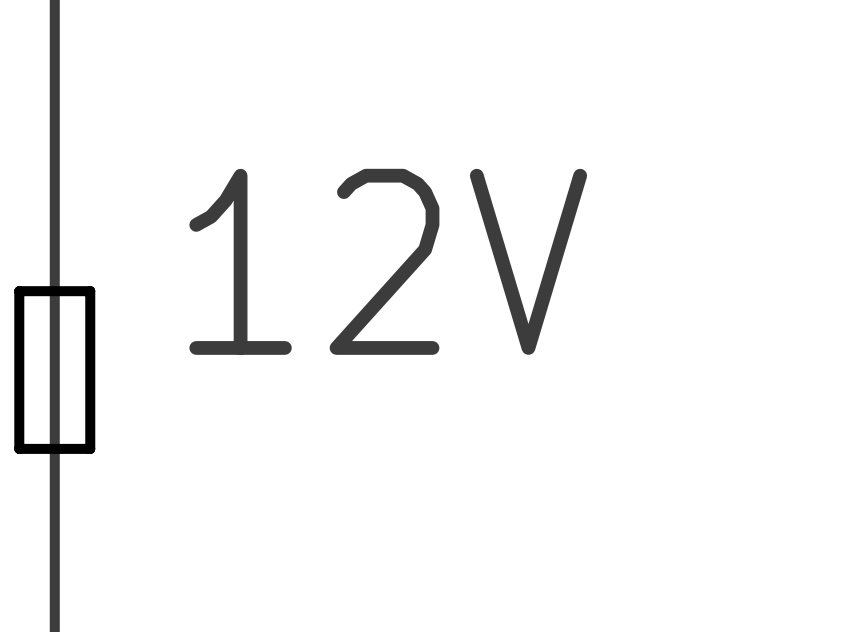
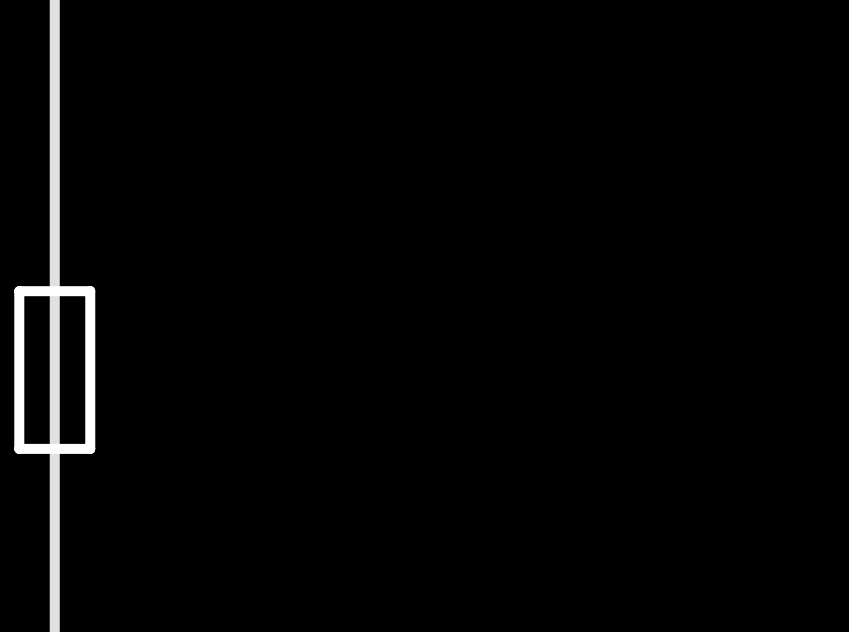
text: 12V (388, 261) -> none

